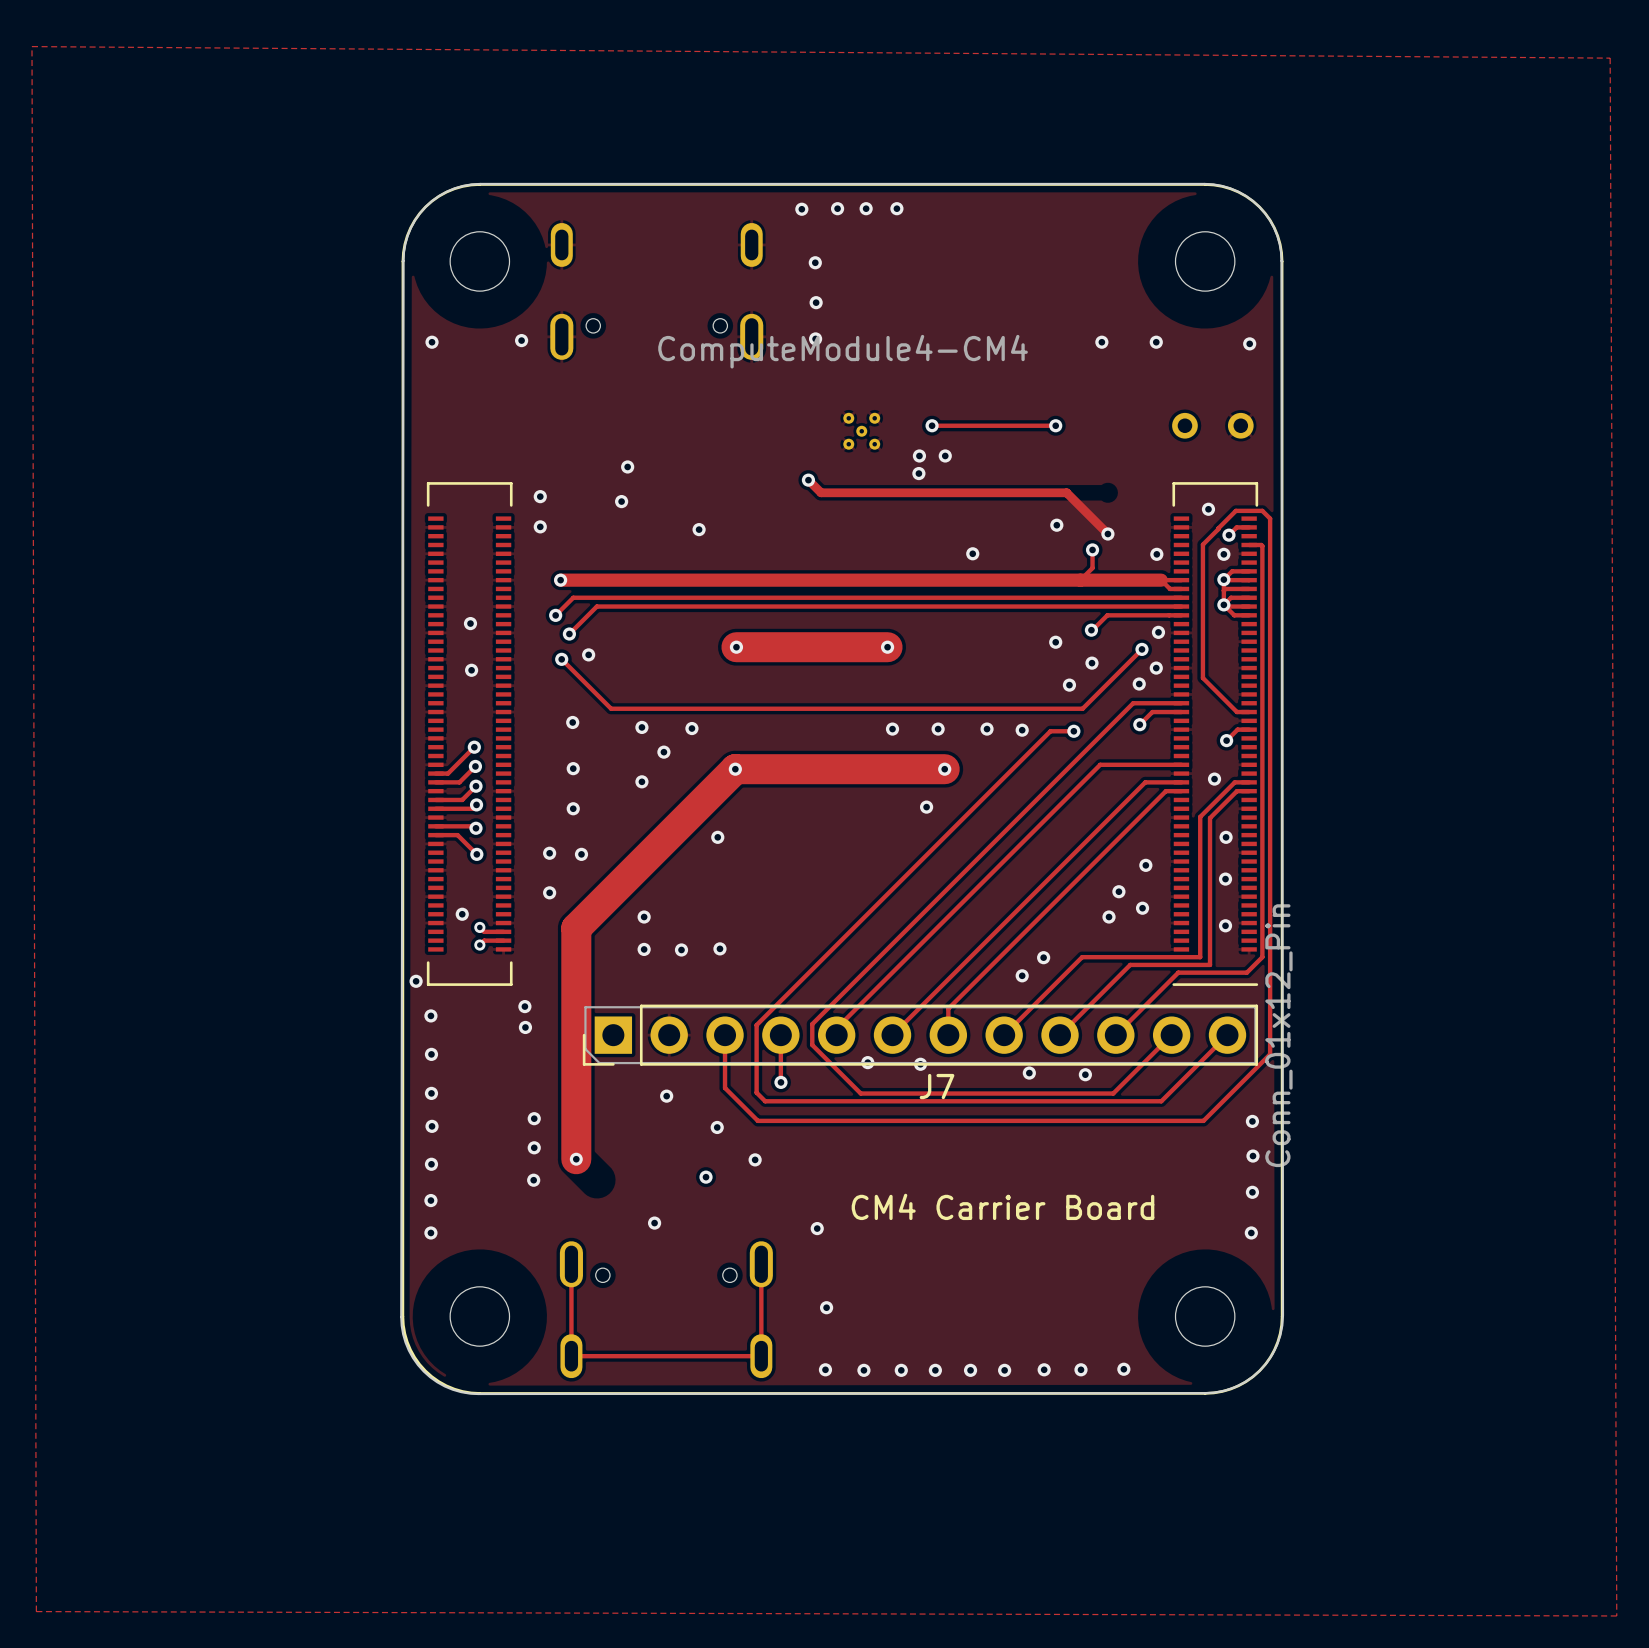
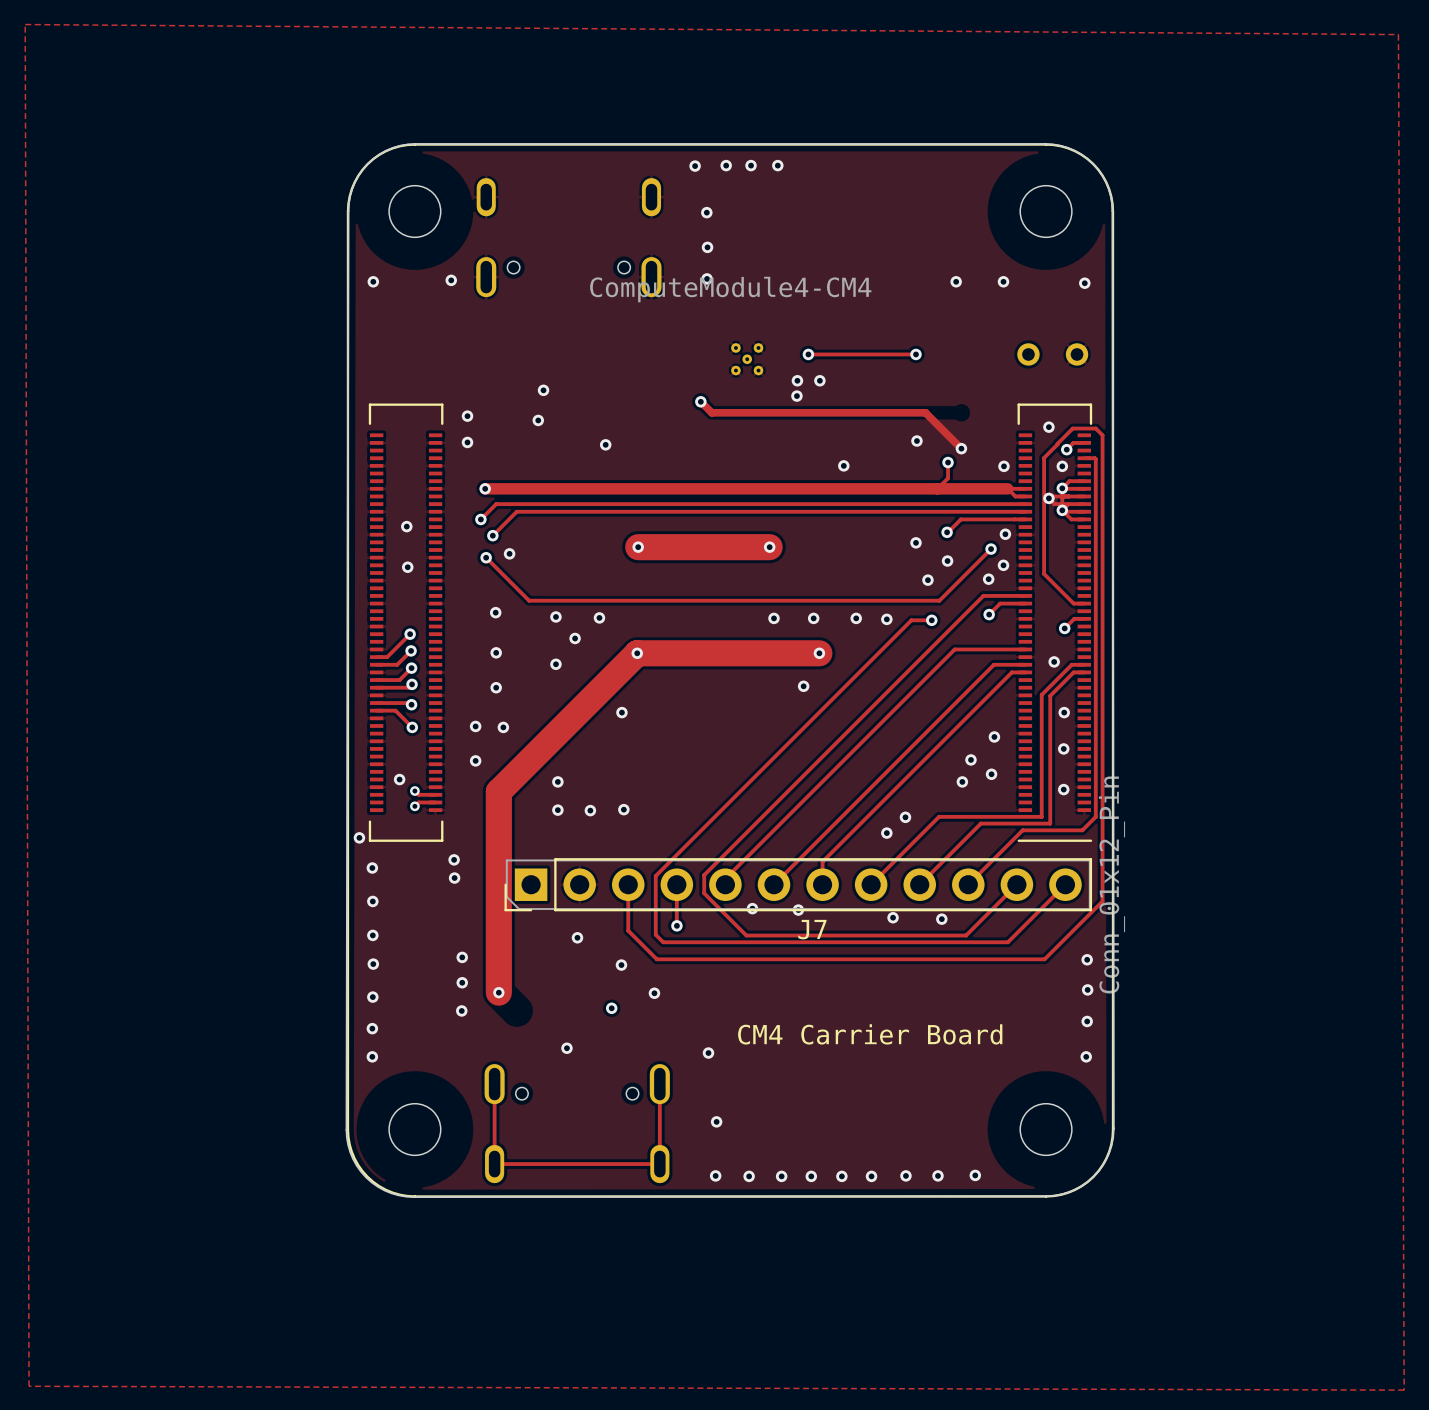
track: none -> (1063, 496) (1050, 496) (1050, 500) (1054, 504) (1068, 504)
via: none -> (1048, 498)

